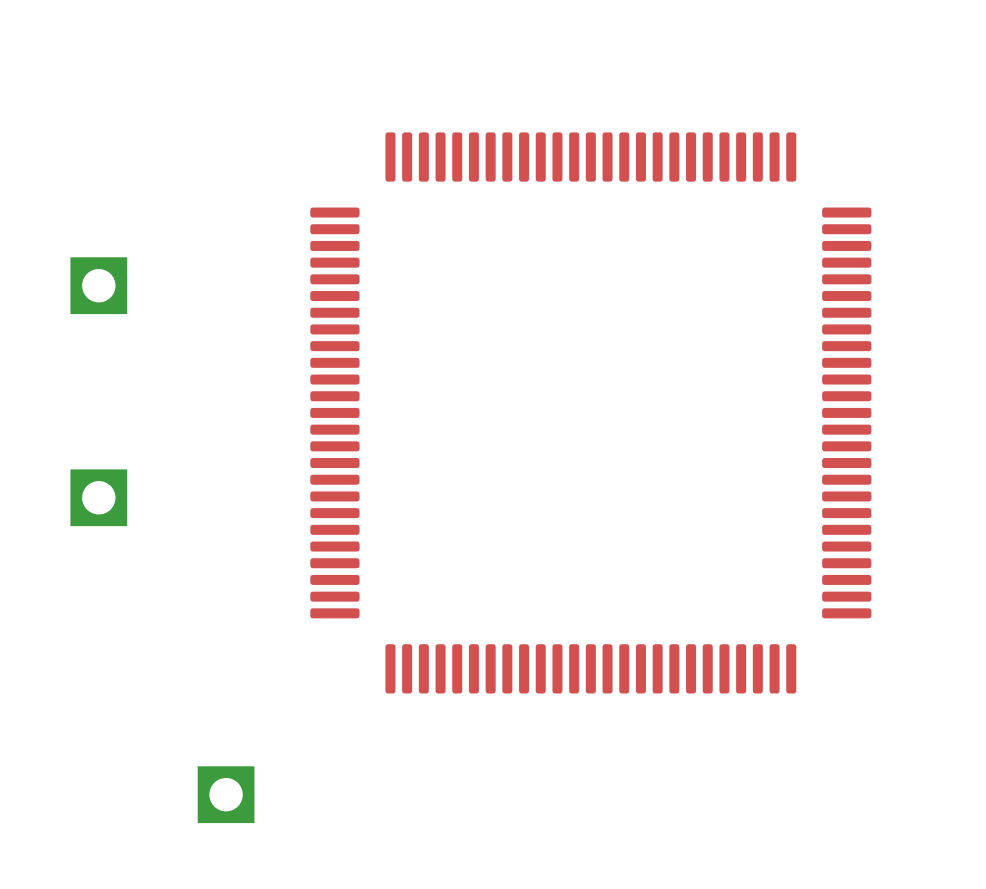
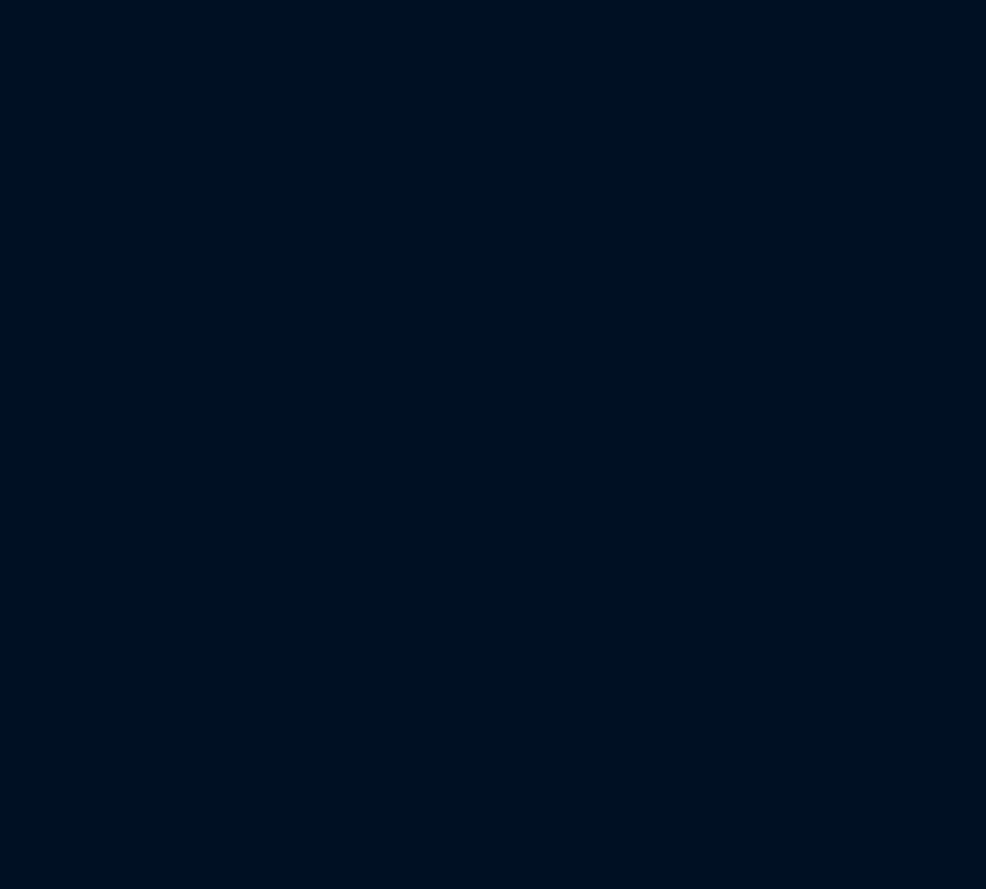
part: (98, 285) -> none
part: (590, 412) -> none
part: (98, 497) -> none
part: (226, 794) -> none

